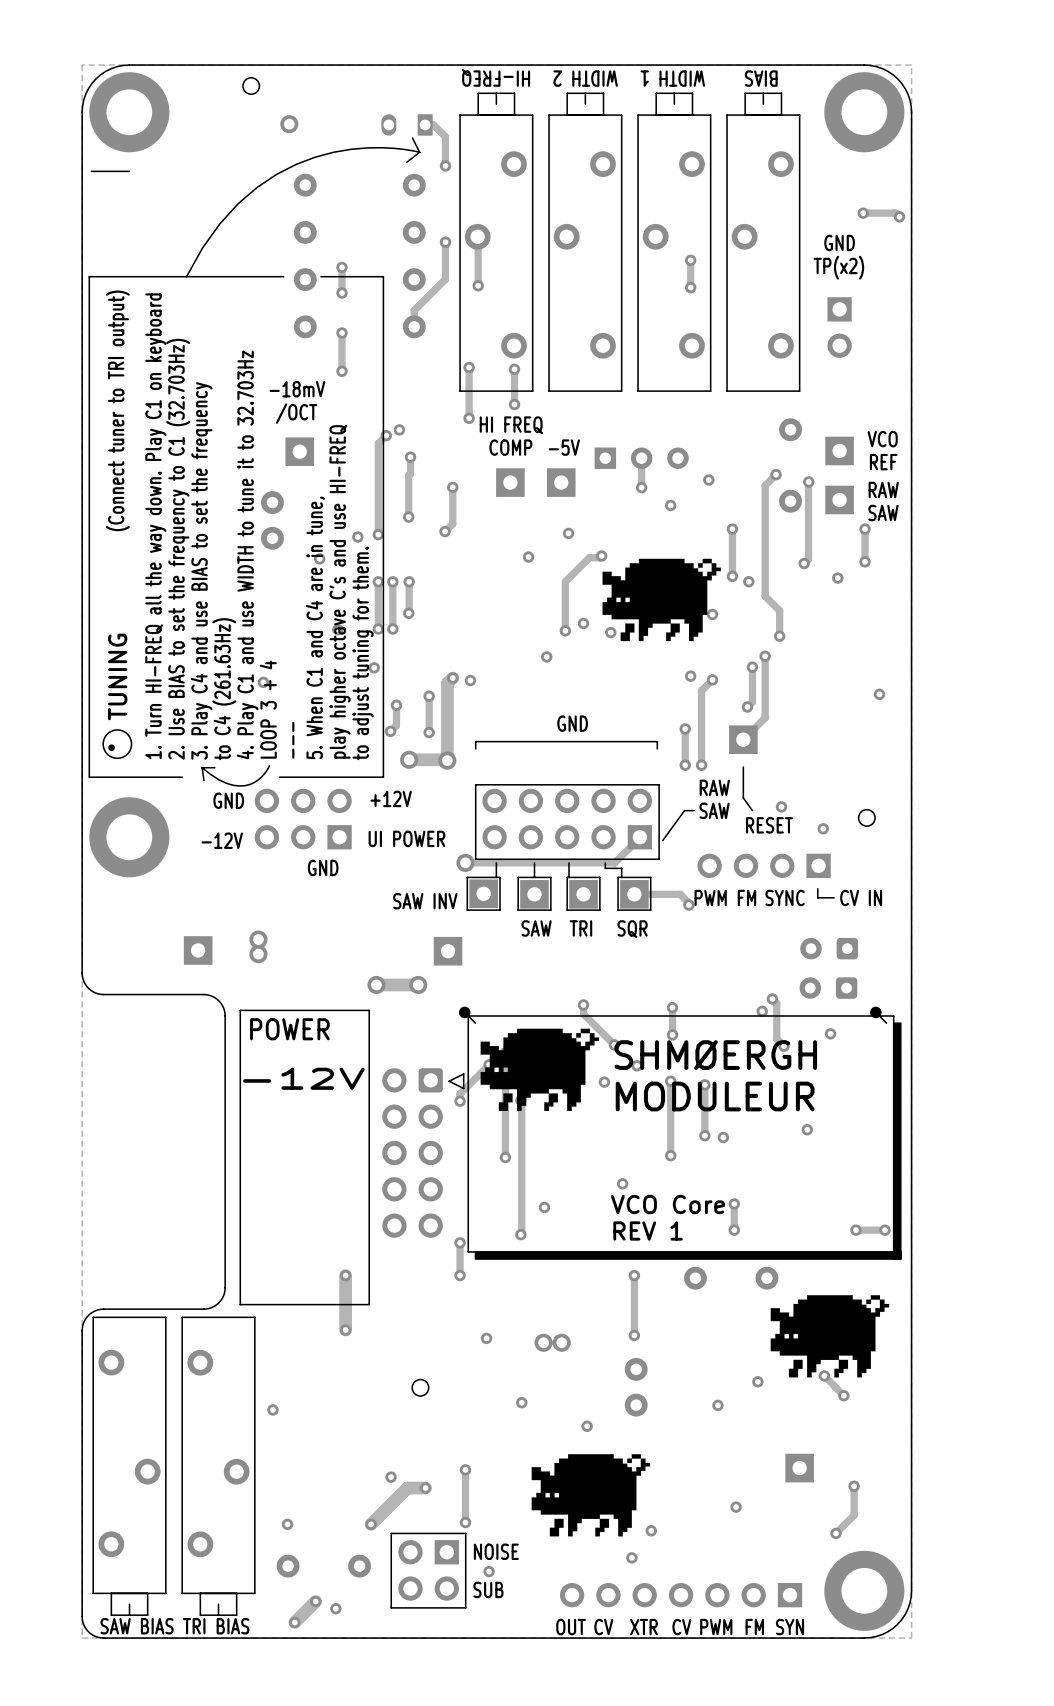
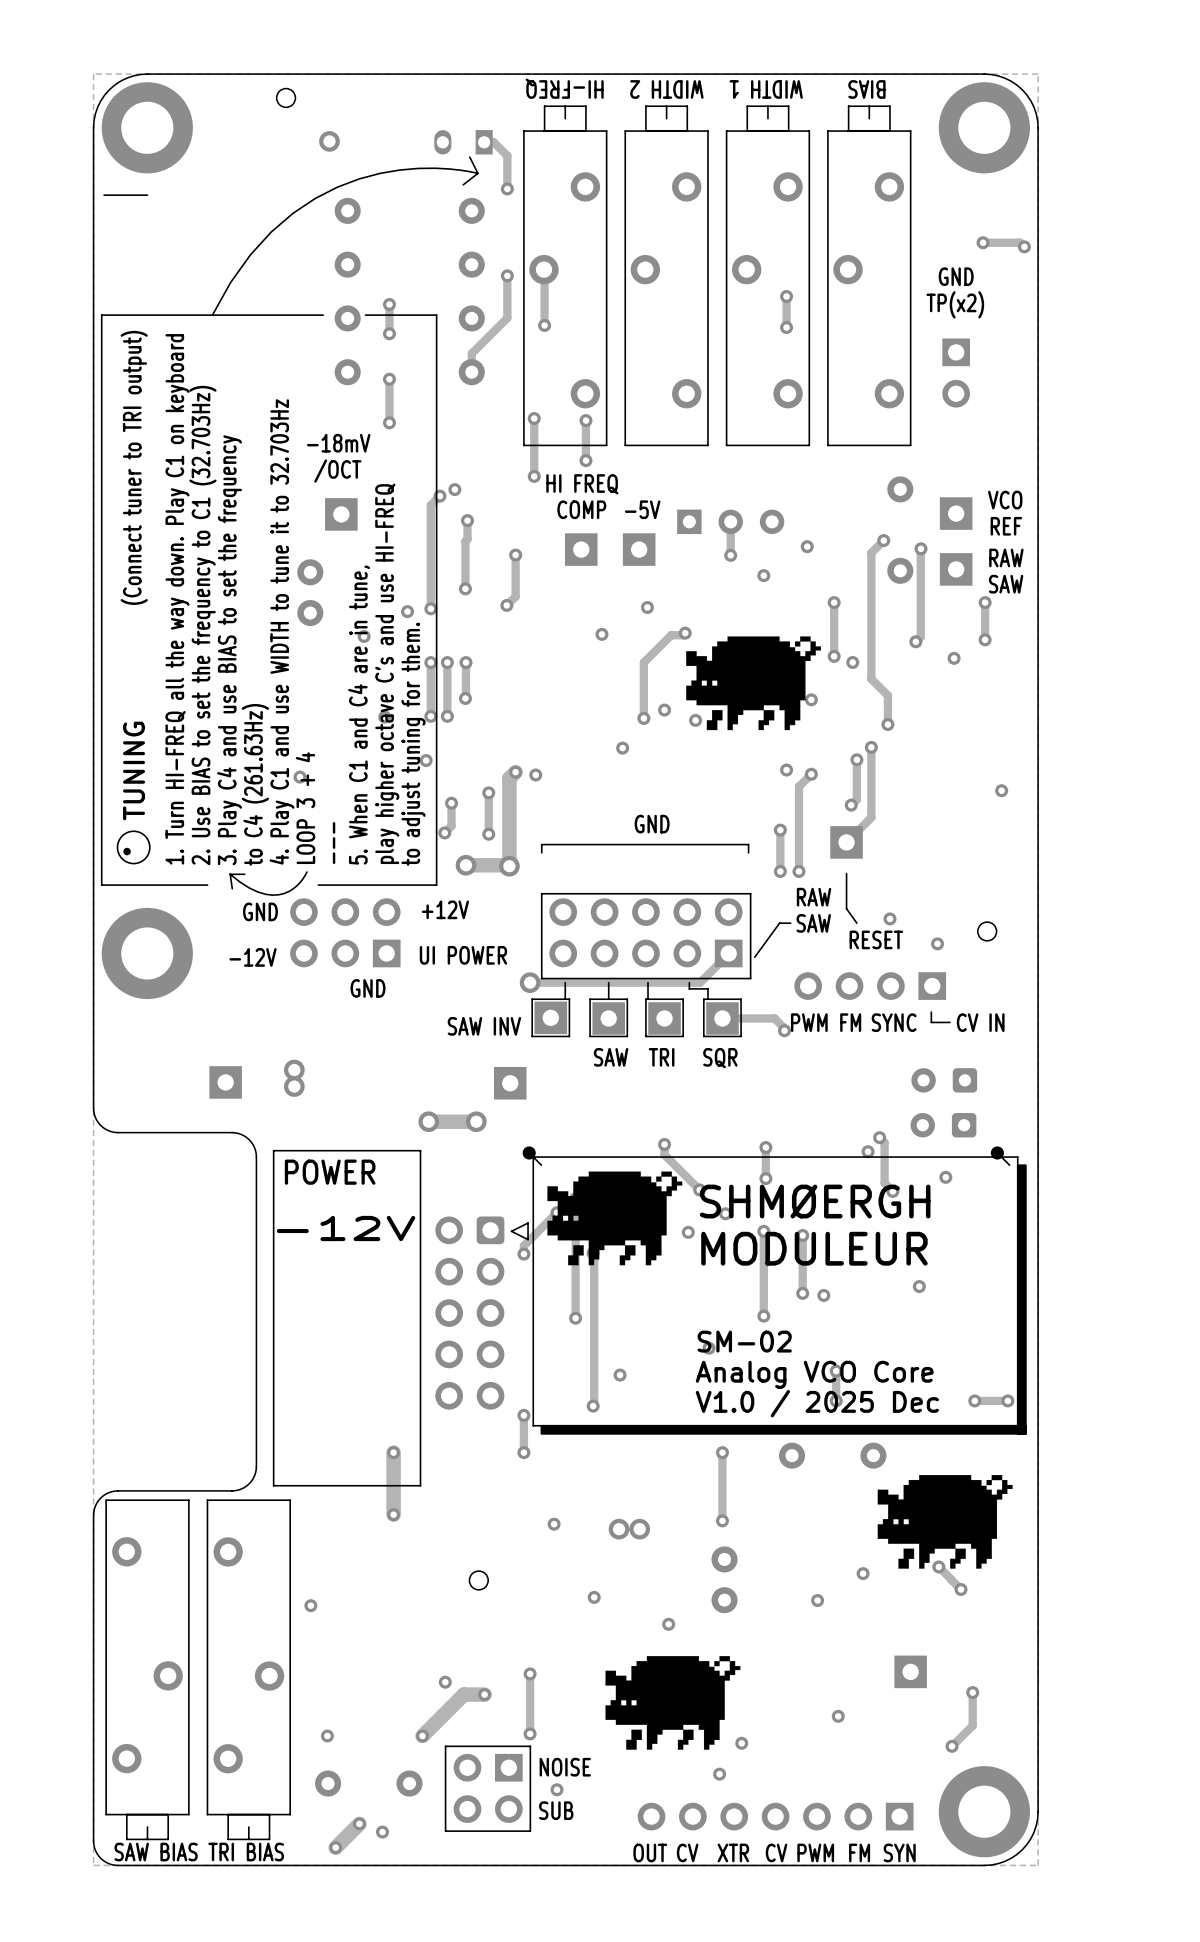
text: none -> SM-02 (744, 1341)
text: VCO Core (668, 1204) -> Analog VCO Core (814, 1374)
text: REV 1 (648, 1230) -> V1.0 / 2025 Dec (817, 1403)

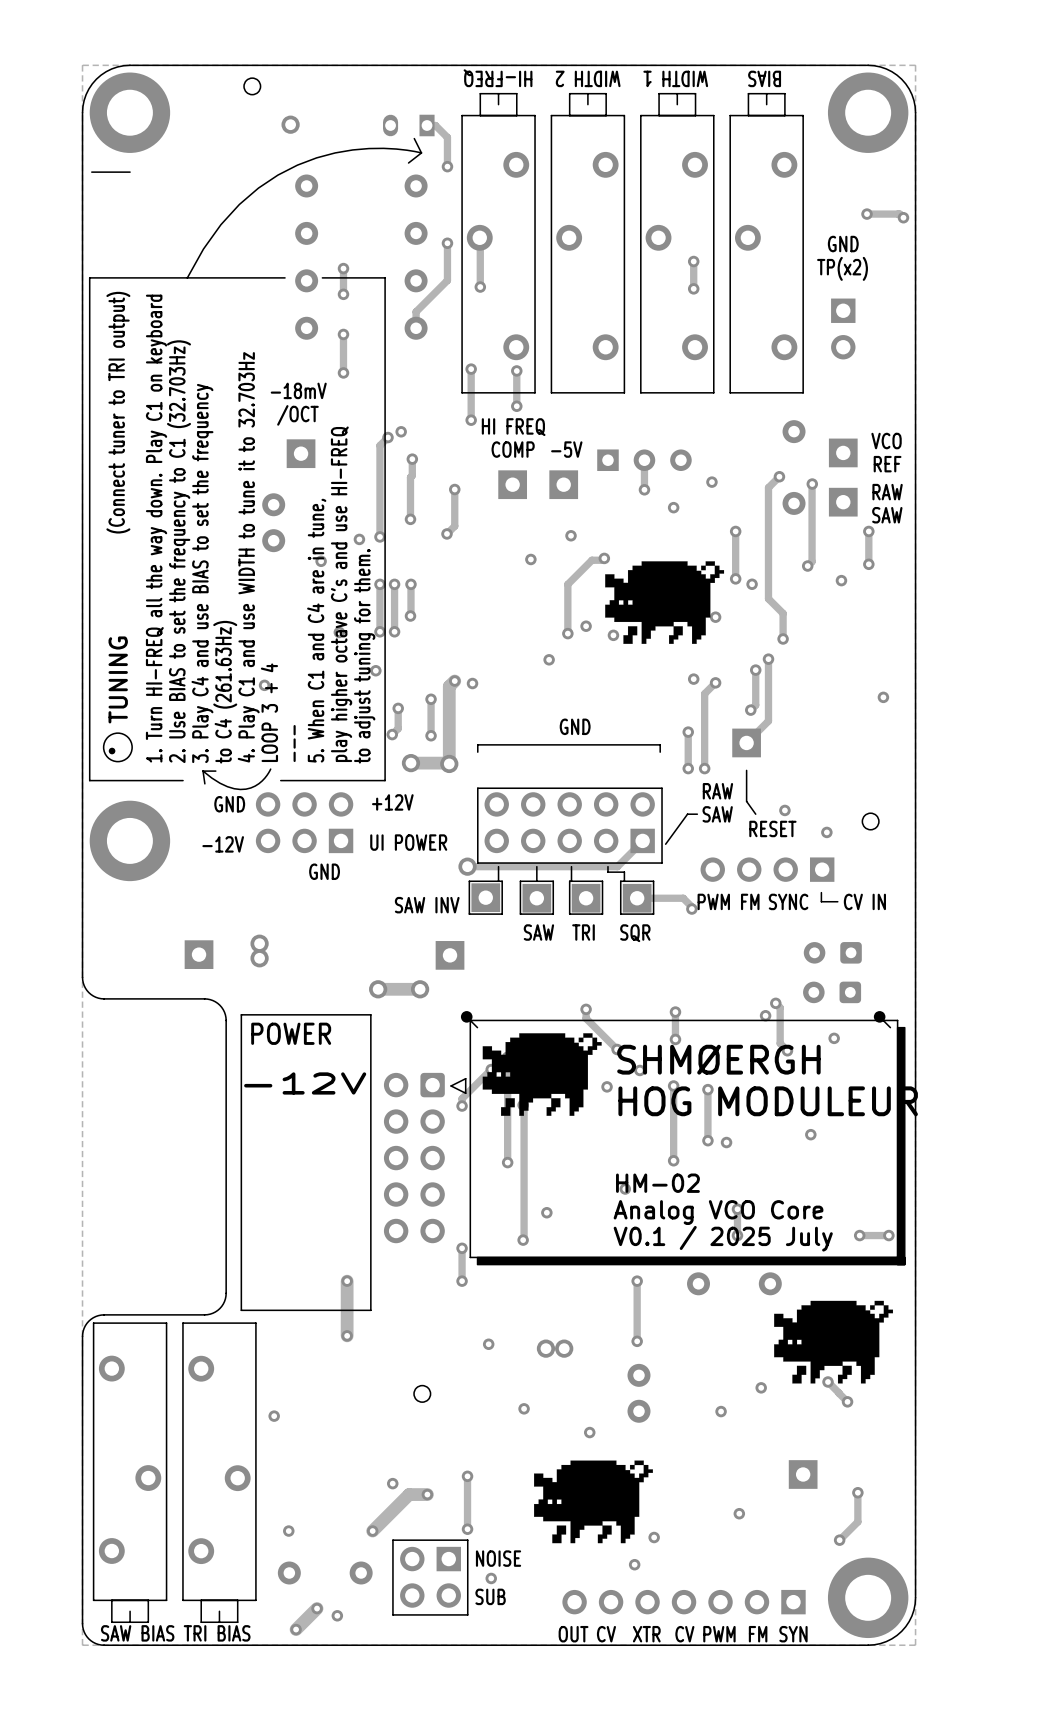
text: MODULEUR (814, 1248) -> HOG MODULEUR (768, 1101)
text: SM-02 (744, 1341) -> HM-02 (657, 1183)
text: V1.0 / 2025 Dec (817, 1403) -> V0.1 / 2025 July (723, 1238)

